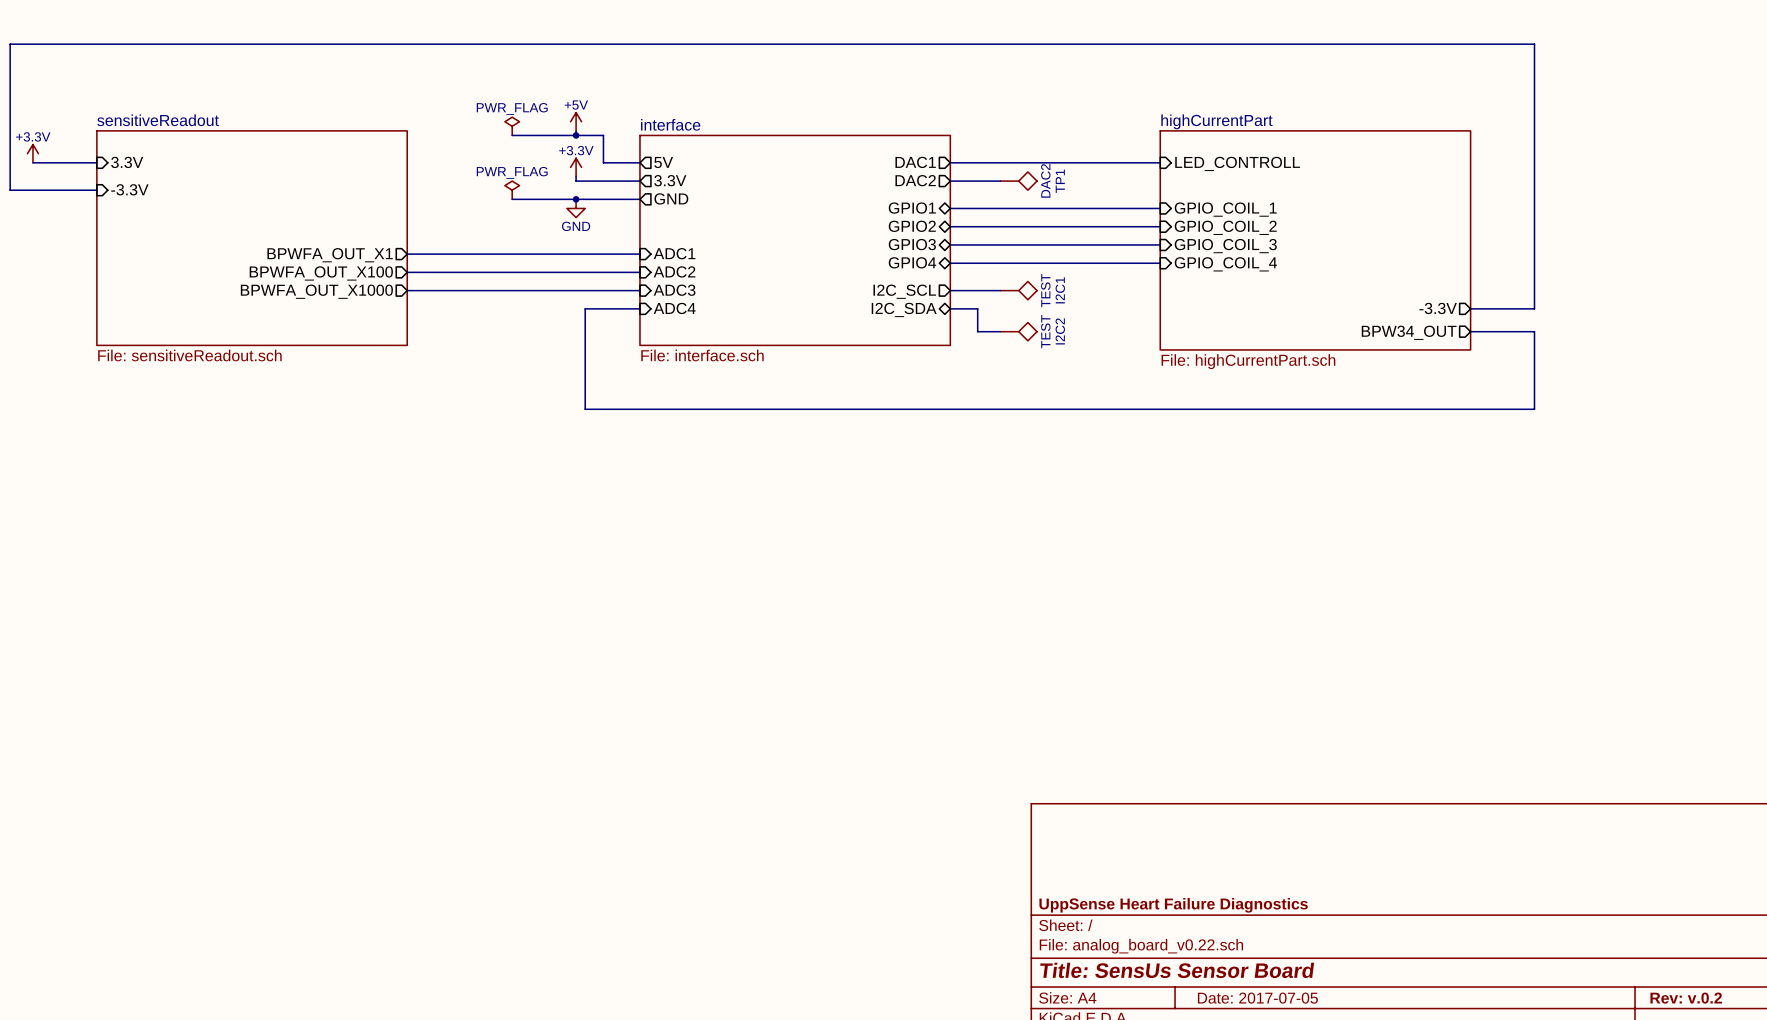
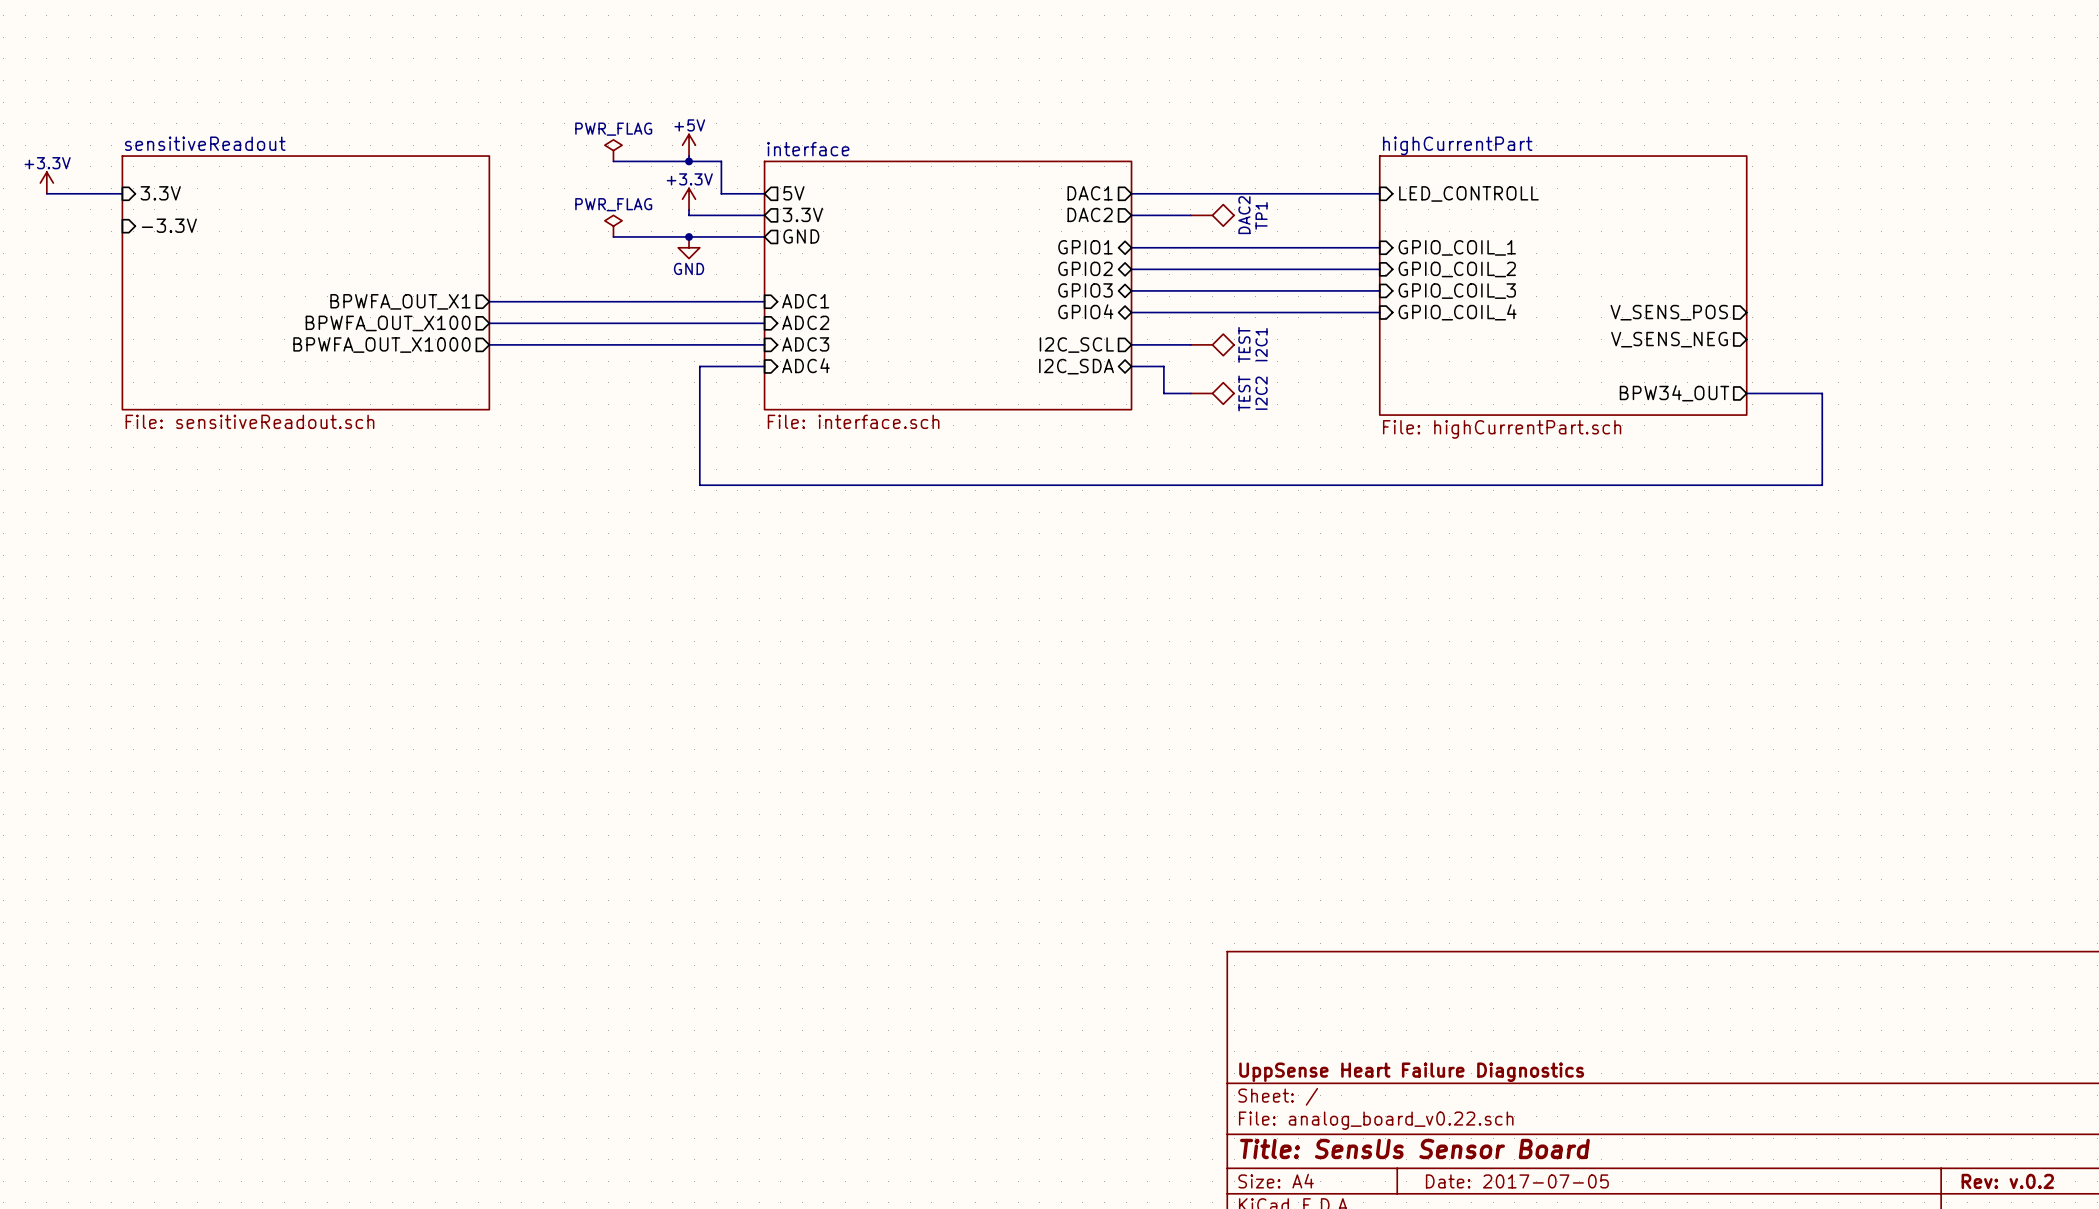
wire: (96, 190) (10, 190) (10, 44) (1534, 44) (1534, 308) (1470, 308) -> none
sheet pin: none -> V_SENS_POS (1669, 312)
sheet pin: none -> V_SENS_NEG (1669, 339)
sheet pin: -3.3V (1438, 308) -> none

